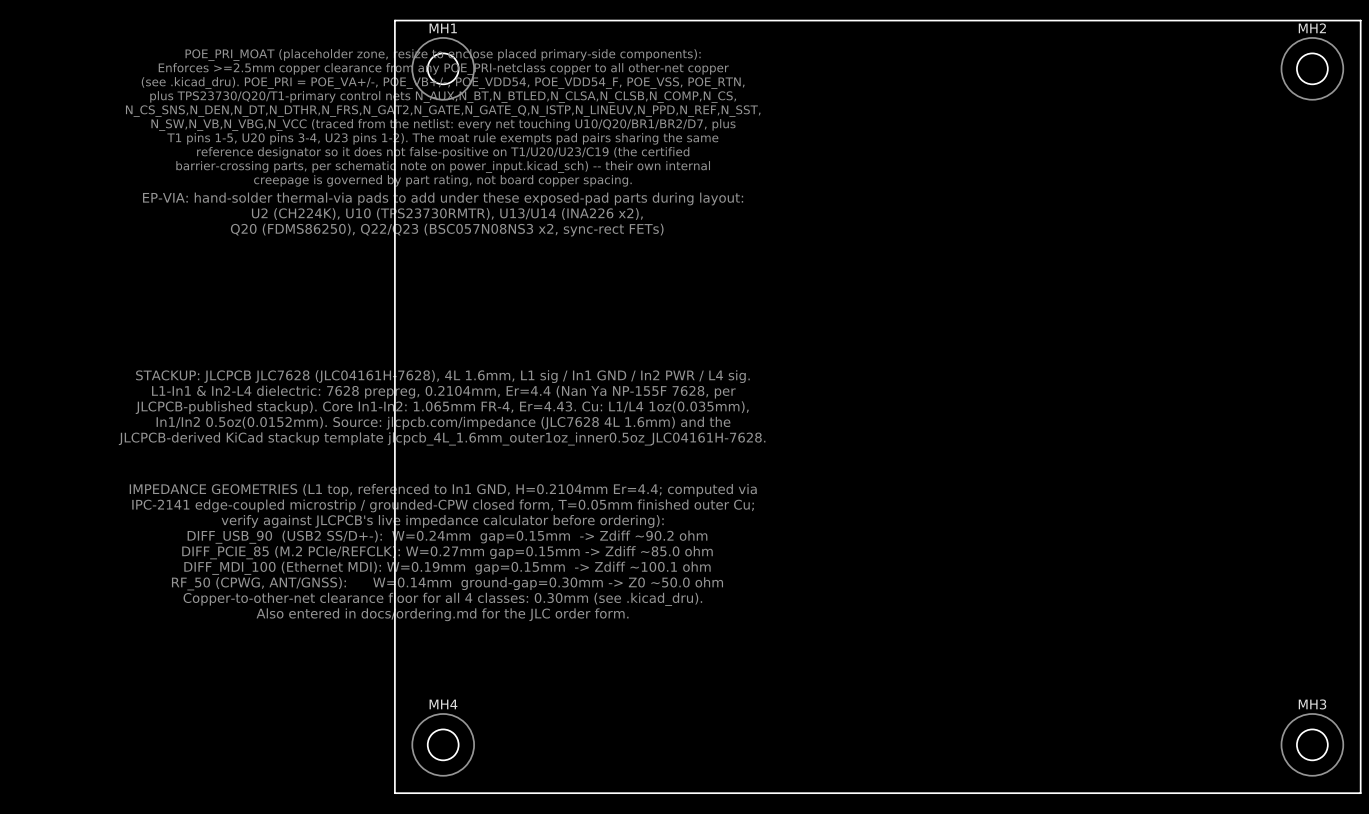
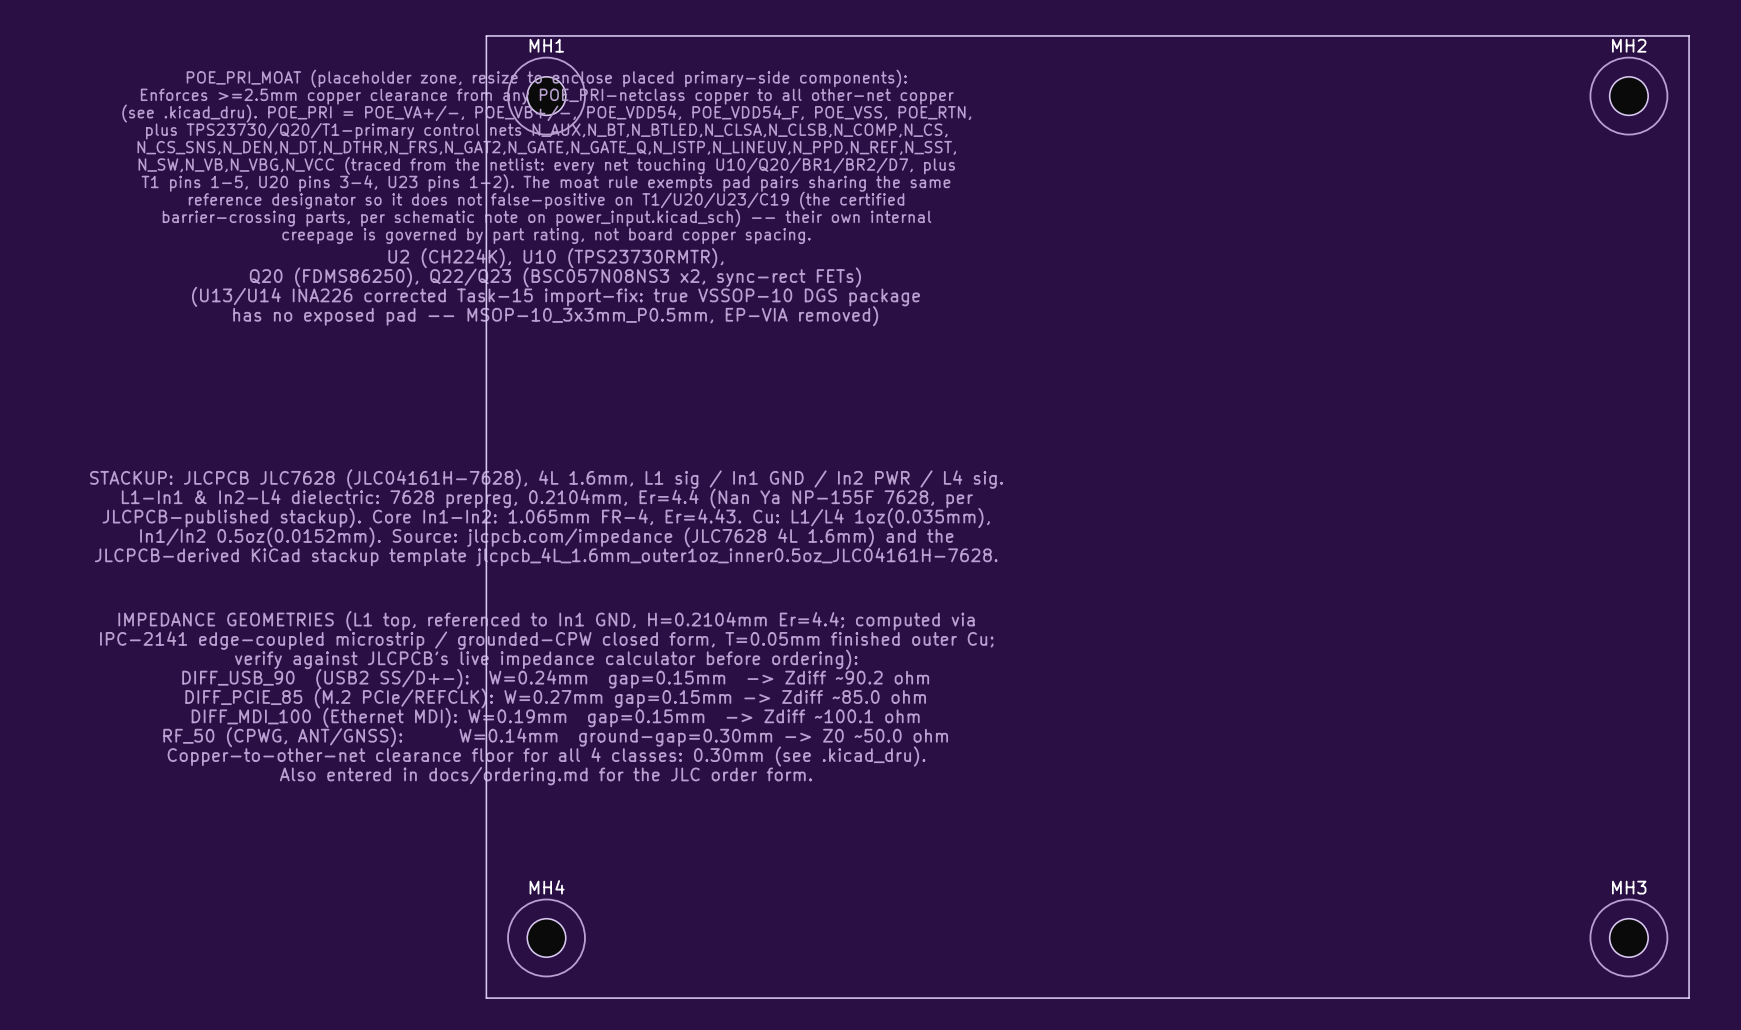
text: EP-VIA: hand-solder thermal-via pads to add under these exposed-pad parts during layout: (443, 198) -> U2 (CH224K), U10 (TPS23730RMTR), (555, 258)
text: U2 (CH224K), U10 (TPS23730RMTR), U13/U14 (INA226 x2), (447, 214) -> Q20 (FDMS86250), Q22/Q23 (BSC057N08NS3 x2, sync-rect FETs) (555, 277)
text: Q20 (FDMS86250), Q22/Q23 (BSC057N08NS3 x2, sync-rect FETs) (447, 230) -> (U13/U14 INA226 corrected Task-15 import-fix: true VSSOP-10 DGS package (555, 296)
text: none -> has no exposed pad -- MSOP-10_3x3mm_P0.5mm, EP-VIA removed) (555, 316)

